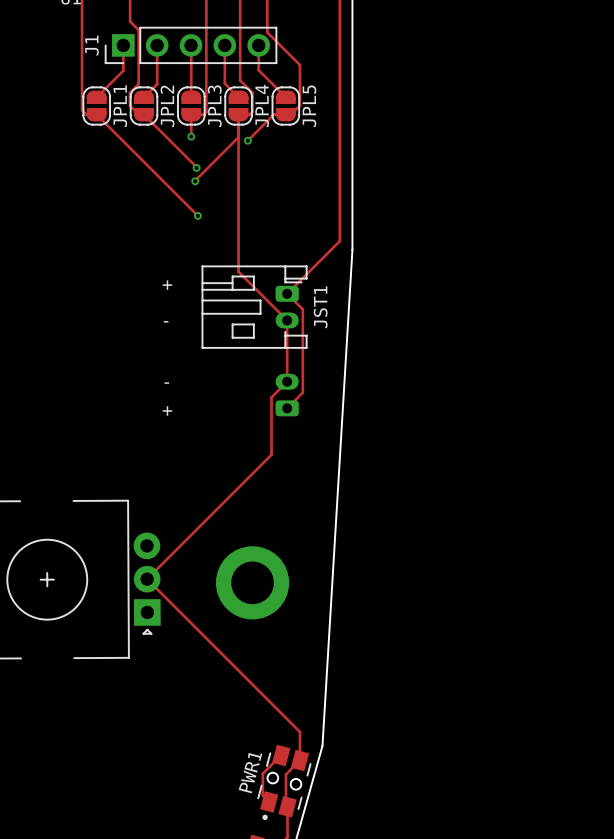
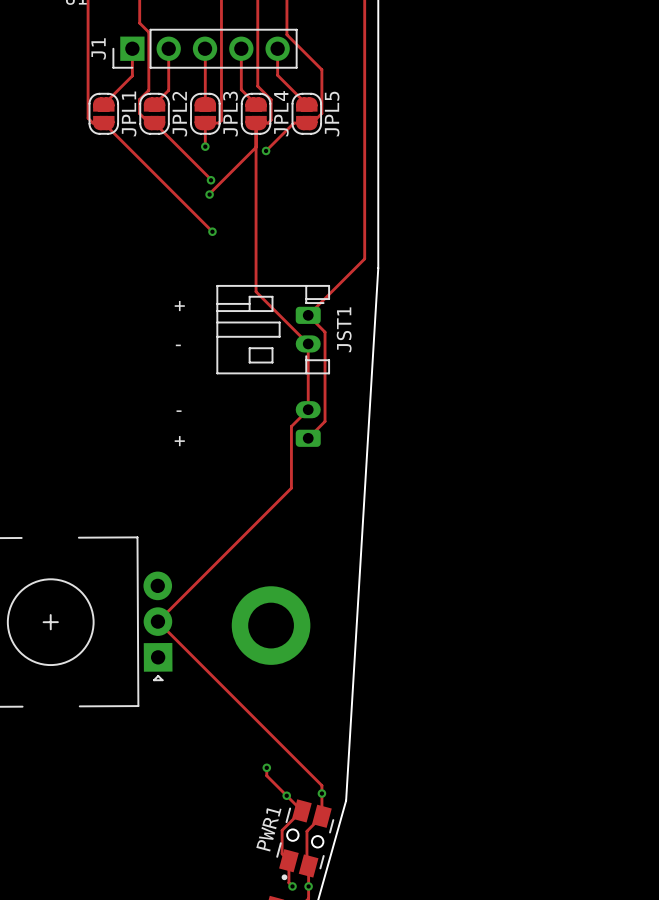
track: none -> (266, 767) (266, 775) (301, 810)
via: none -> (266, 767)
via: none -> (321, 793)
via: none -> (286, 795)
track: none -> (288, 860) (288, 882) (292, 886)
via: none -> (292, 886)
via: none -> (308, 886)

